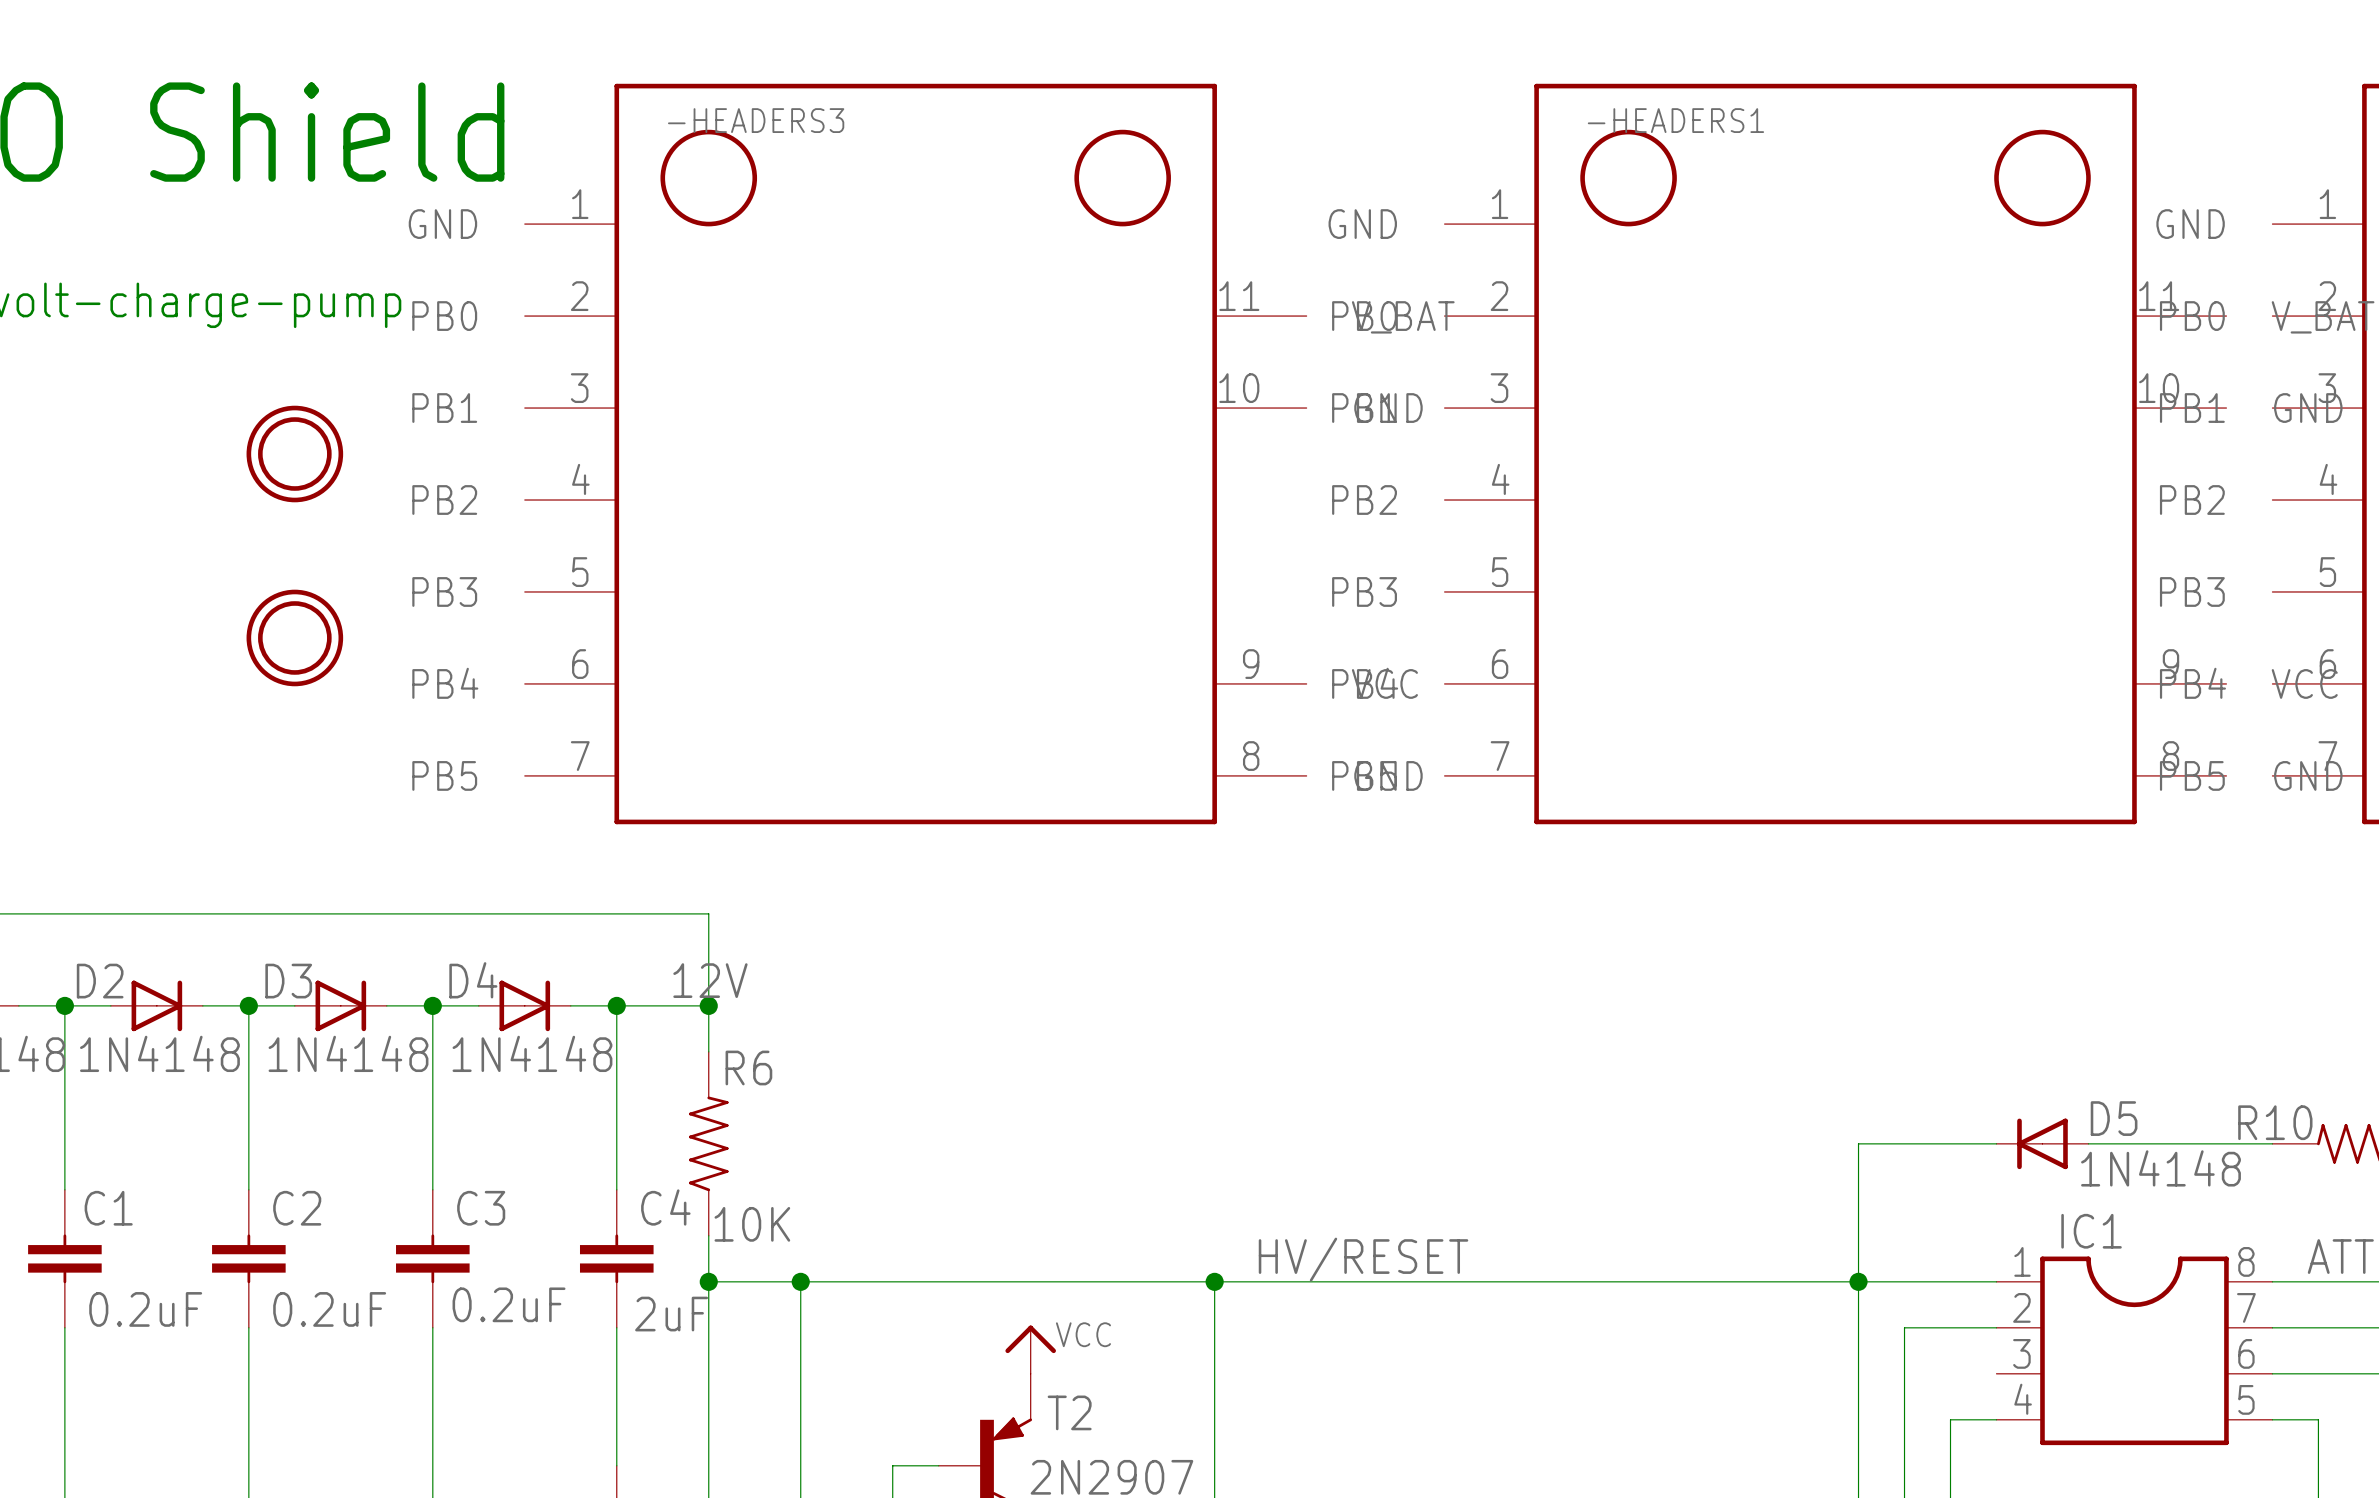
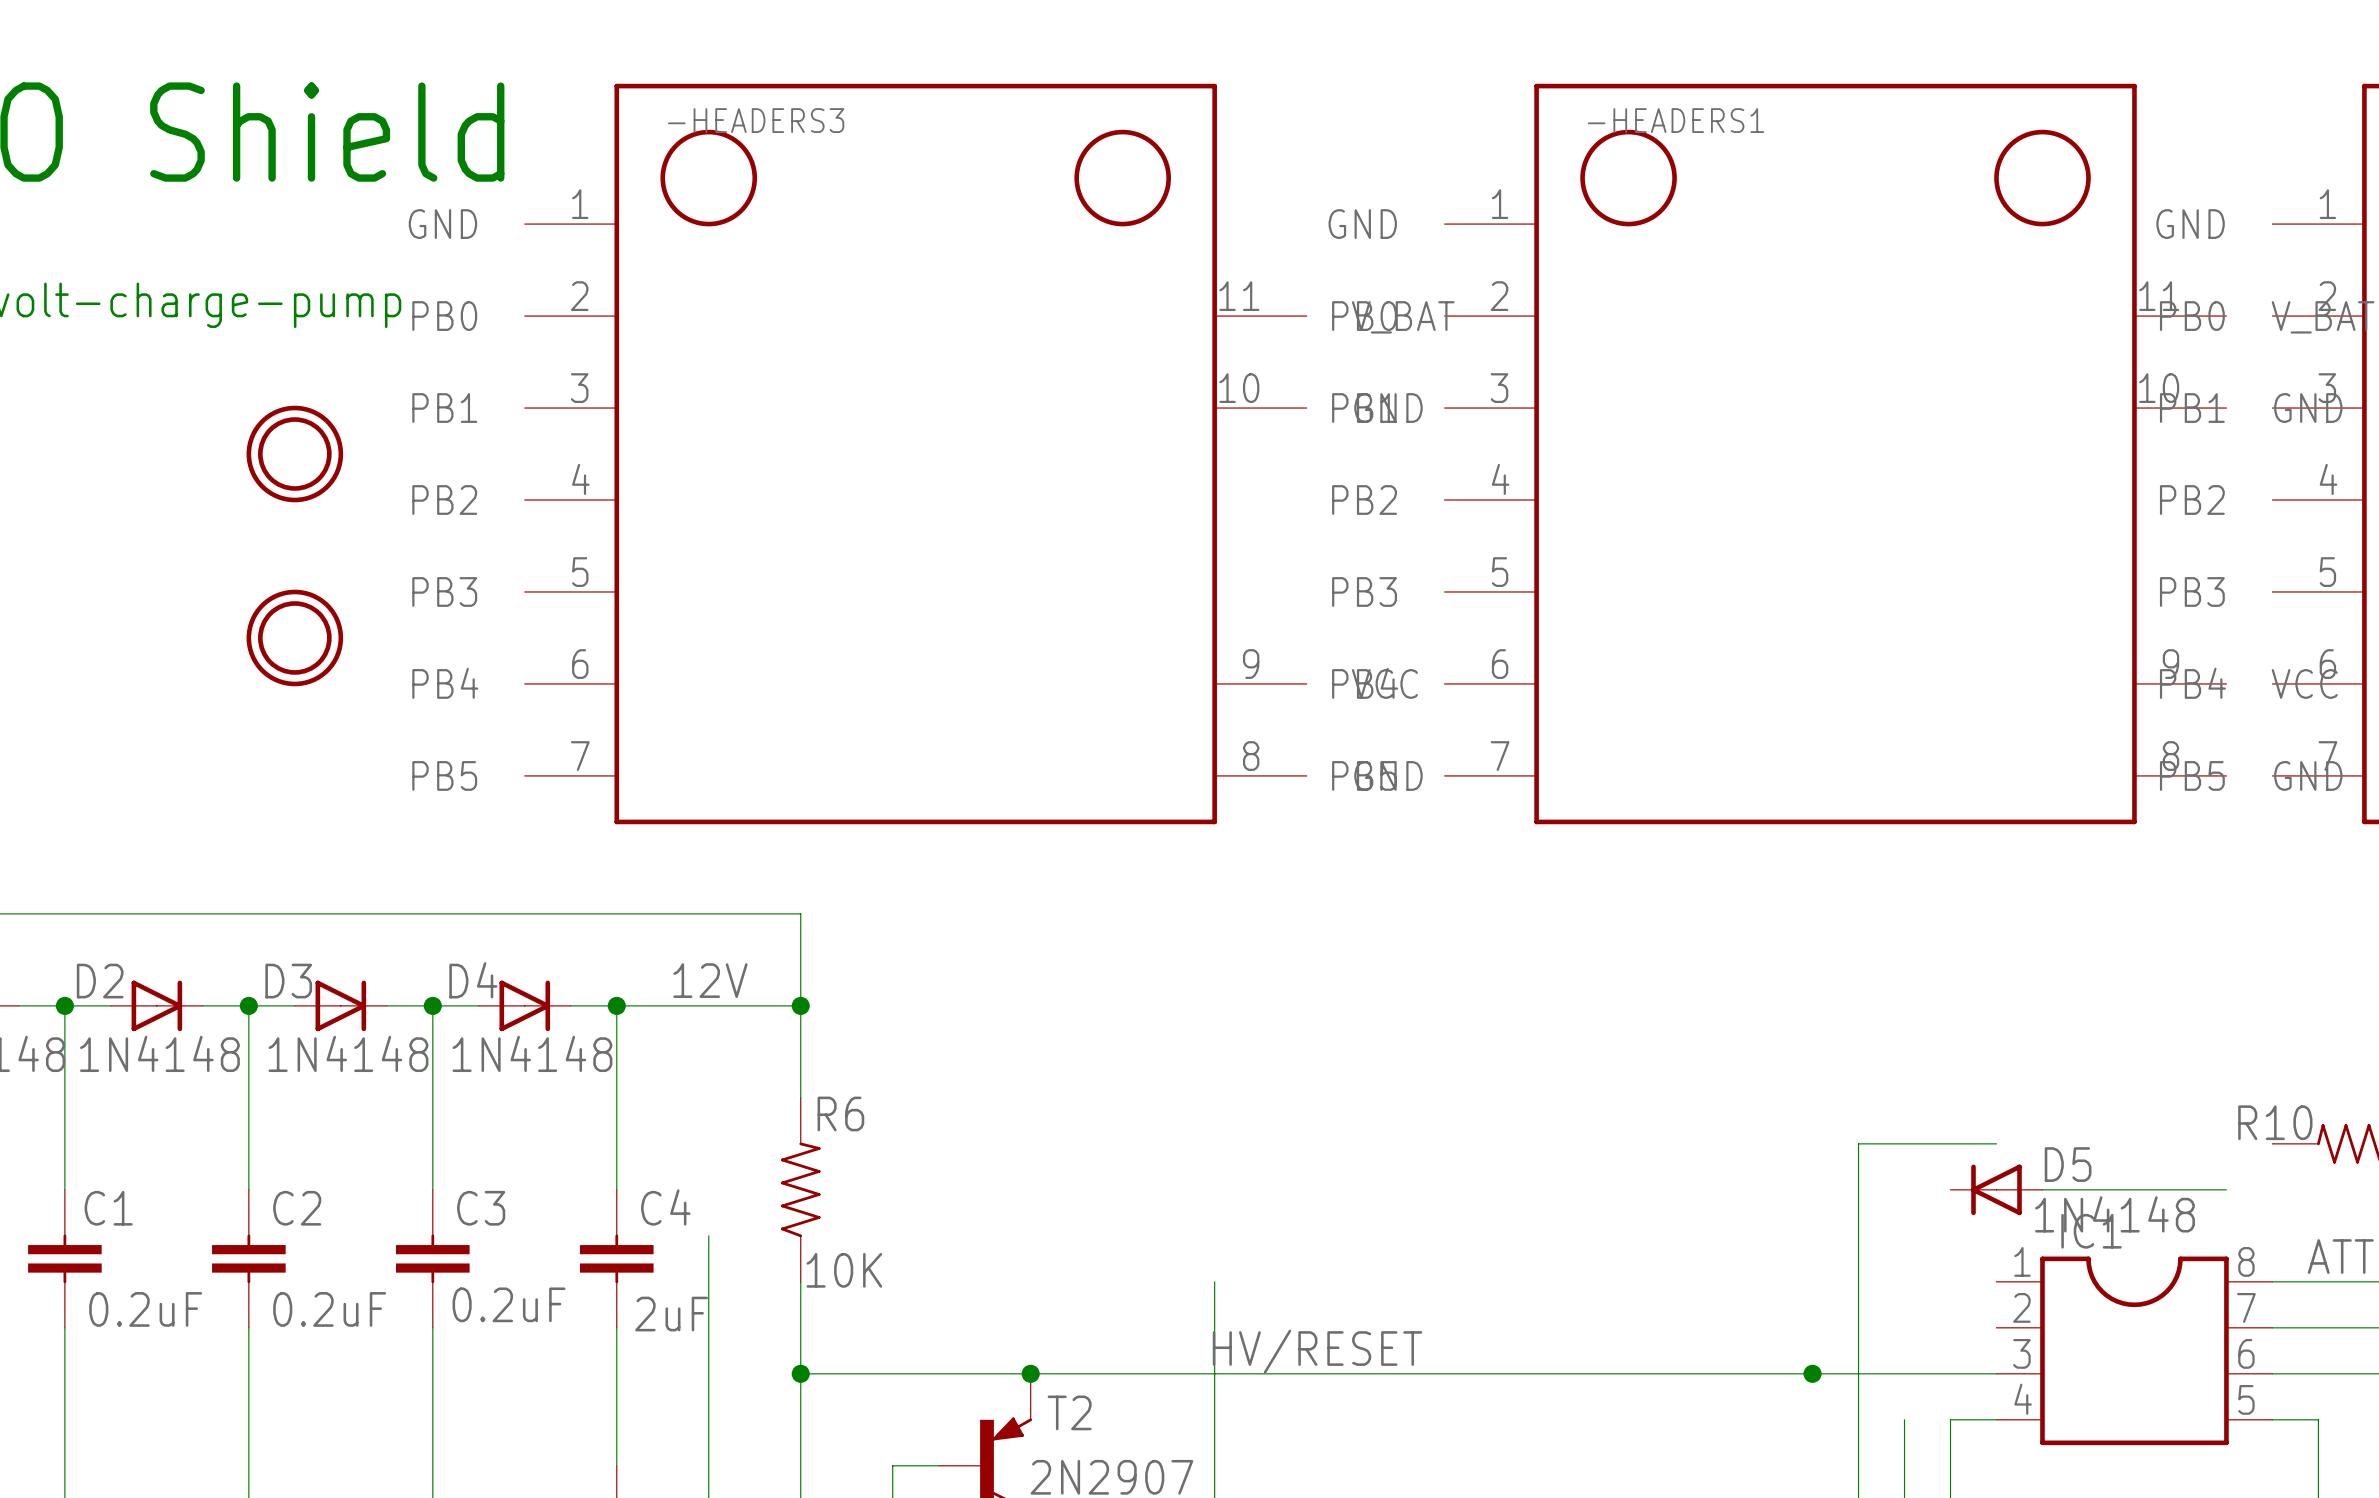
wire: (708, 913) (708, 1051) -> (708, 913) (800, 913) (800, 1097)
wire: none -> (708, 1005) (800, 1005)
junction position: (708, 1005) -> (800, 1005)
R6 position: (708, 1143) -> (800, 1189)
D5 position: (2042, 1143) -> (1996, 1189)
wire: (2088, 1143) (2272, 1143) -> (2042, 1189) (2226, 1189)
label position: HV/RESET (1363, 1259) -> HV/RESET (1317, 1351)
wire: (708, 1281) (1996, 1281) -> none
junction: (708, 1281) -> none
junction: (800, 1281) -> none
junction: (1214, 1281) -> none
junction position: (1858, 1281) -> (1812, 1373)
wire: (1996, 1327) (1904, 1327) (1904, 1419) -> none
power symbol: VCC (1030, 1349) -> none
wire: none -> (800, 1373) (1996, 1373)
junction: none -> (800, 1373)
junction: none -> (1030, 1373)

